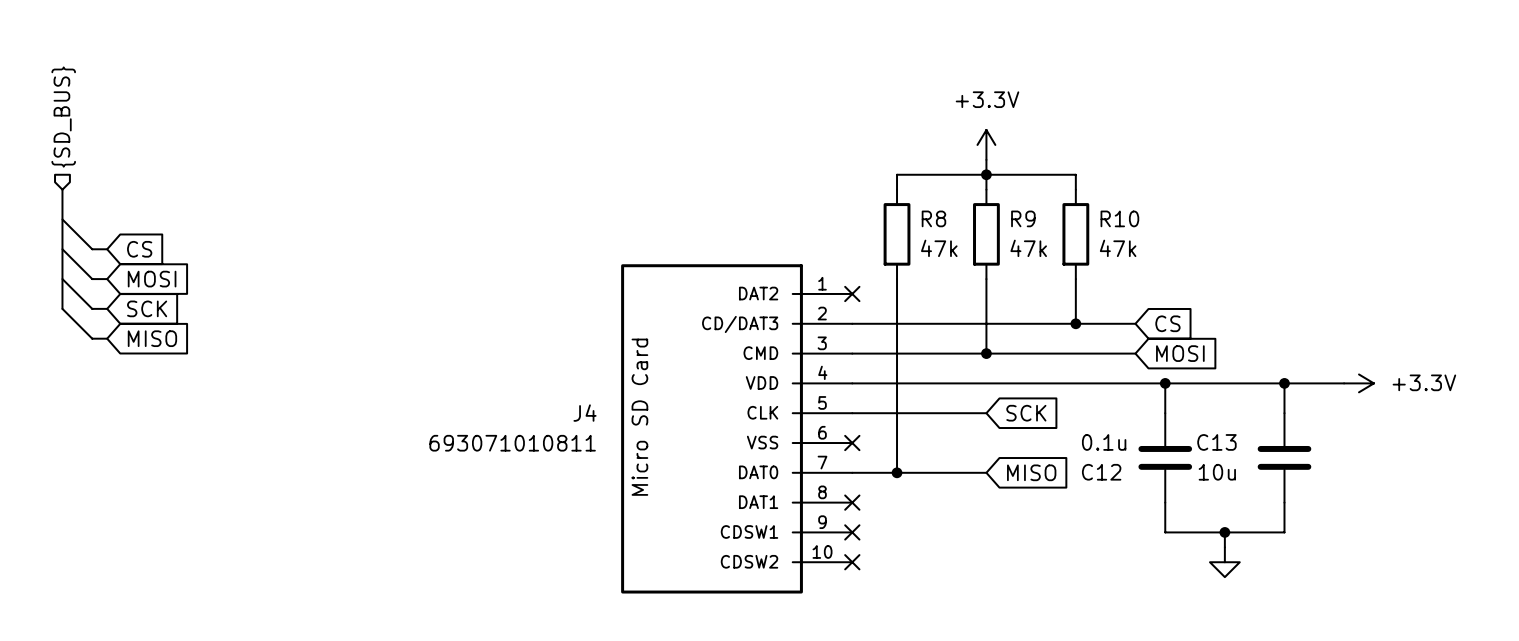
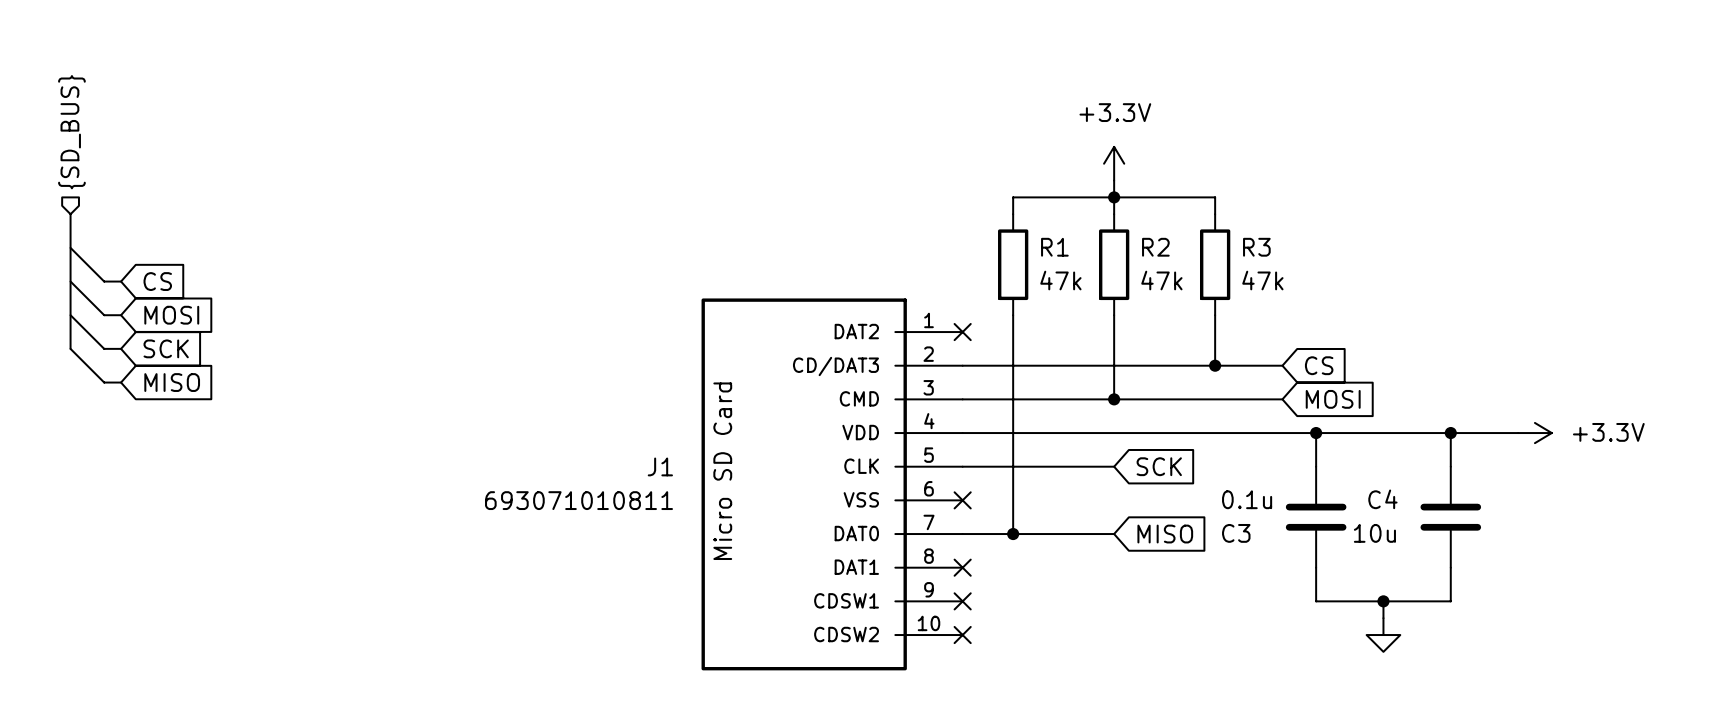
R8 name: R8 (933, 218) -> R1 (1054, 247)
R9 name: R9 (1023, 218) -> R2 (1155, 247)
R10 name: R10 (1119, 218) -> R3 (1256, 247)
J4 name: J4 (585, 413) -> J1 (660, 466)
C13 name: C13 (1216, 442) -> C4 (1382, 499)
C12 name: C12 (1101, 472) -> C3 (1236, 533)

